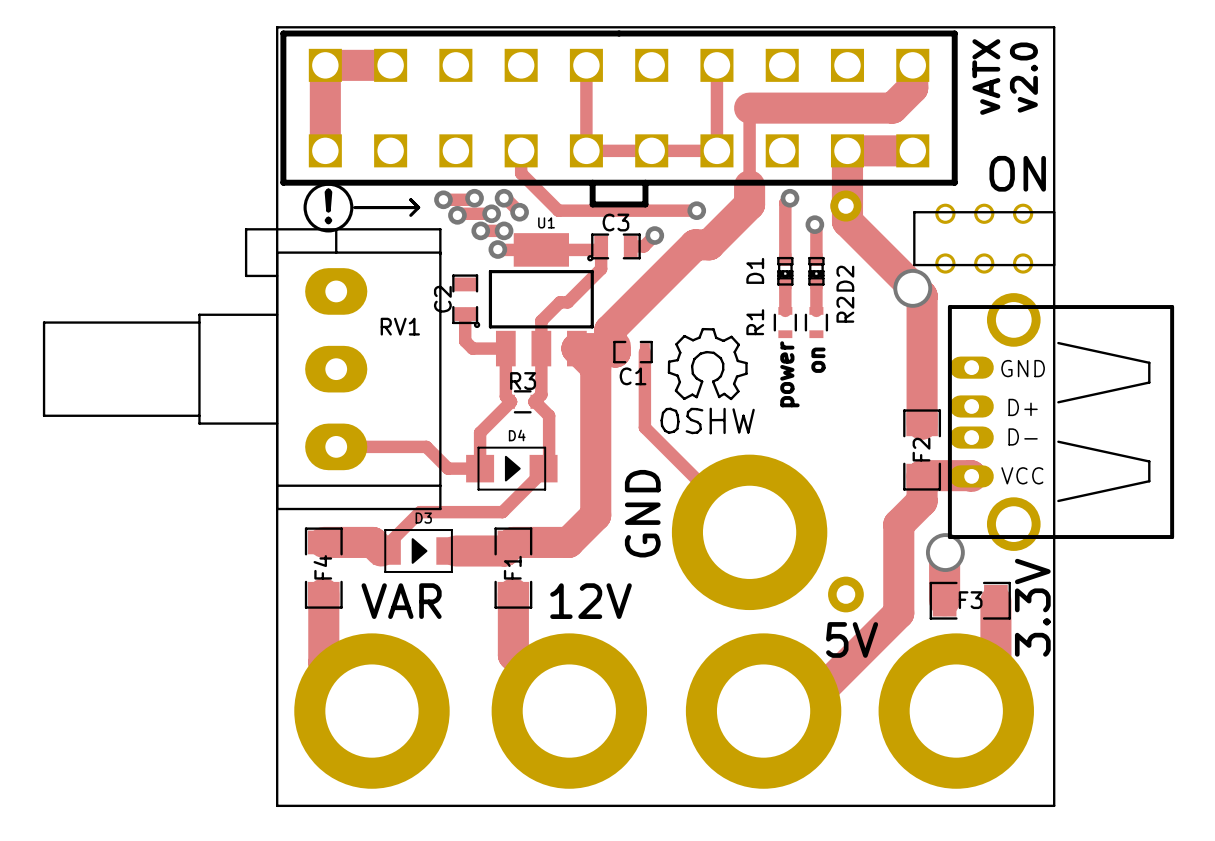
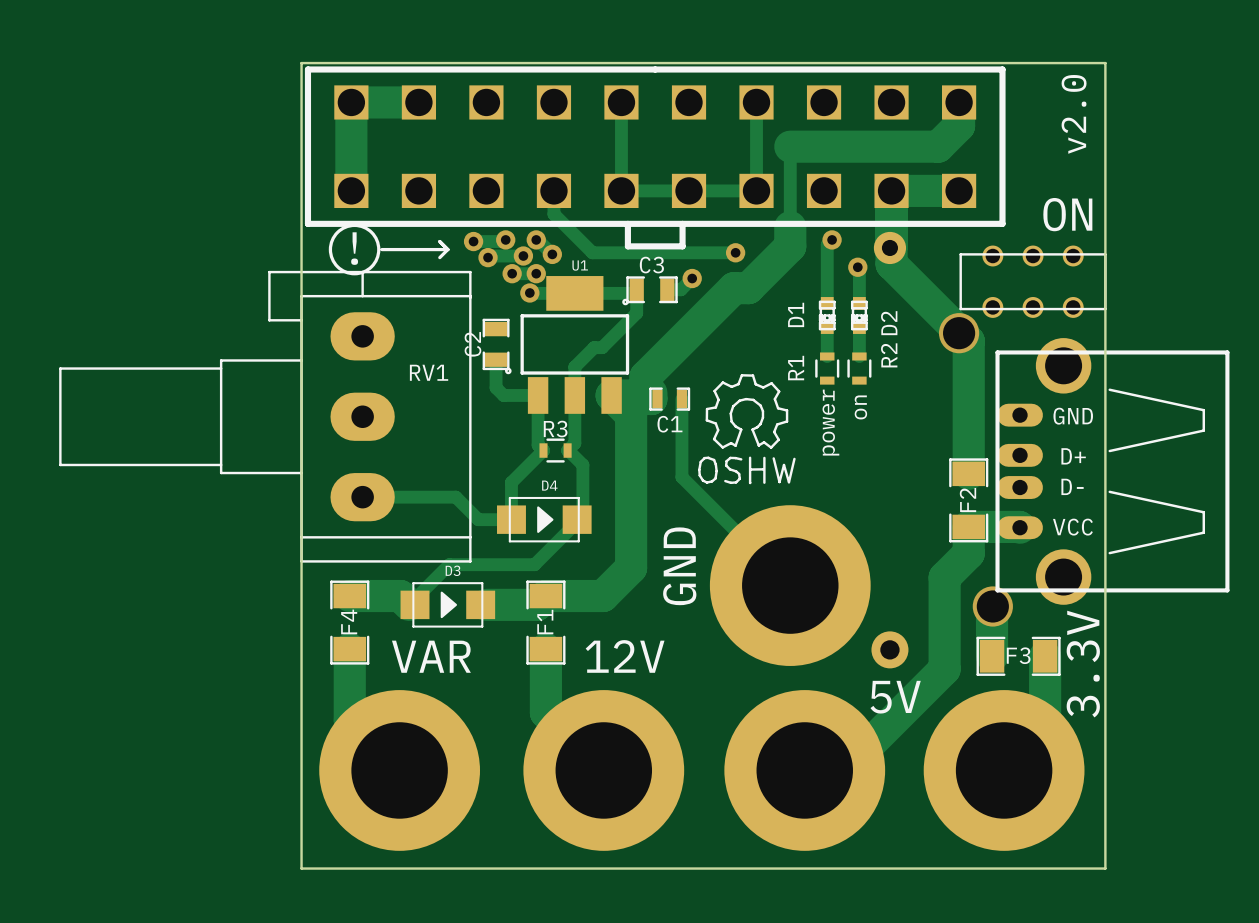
text: vATX (986, 77) -> none

